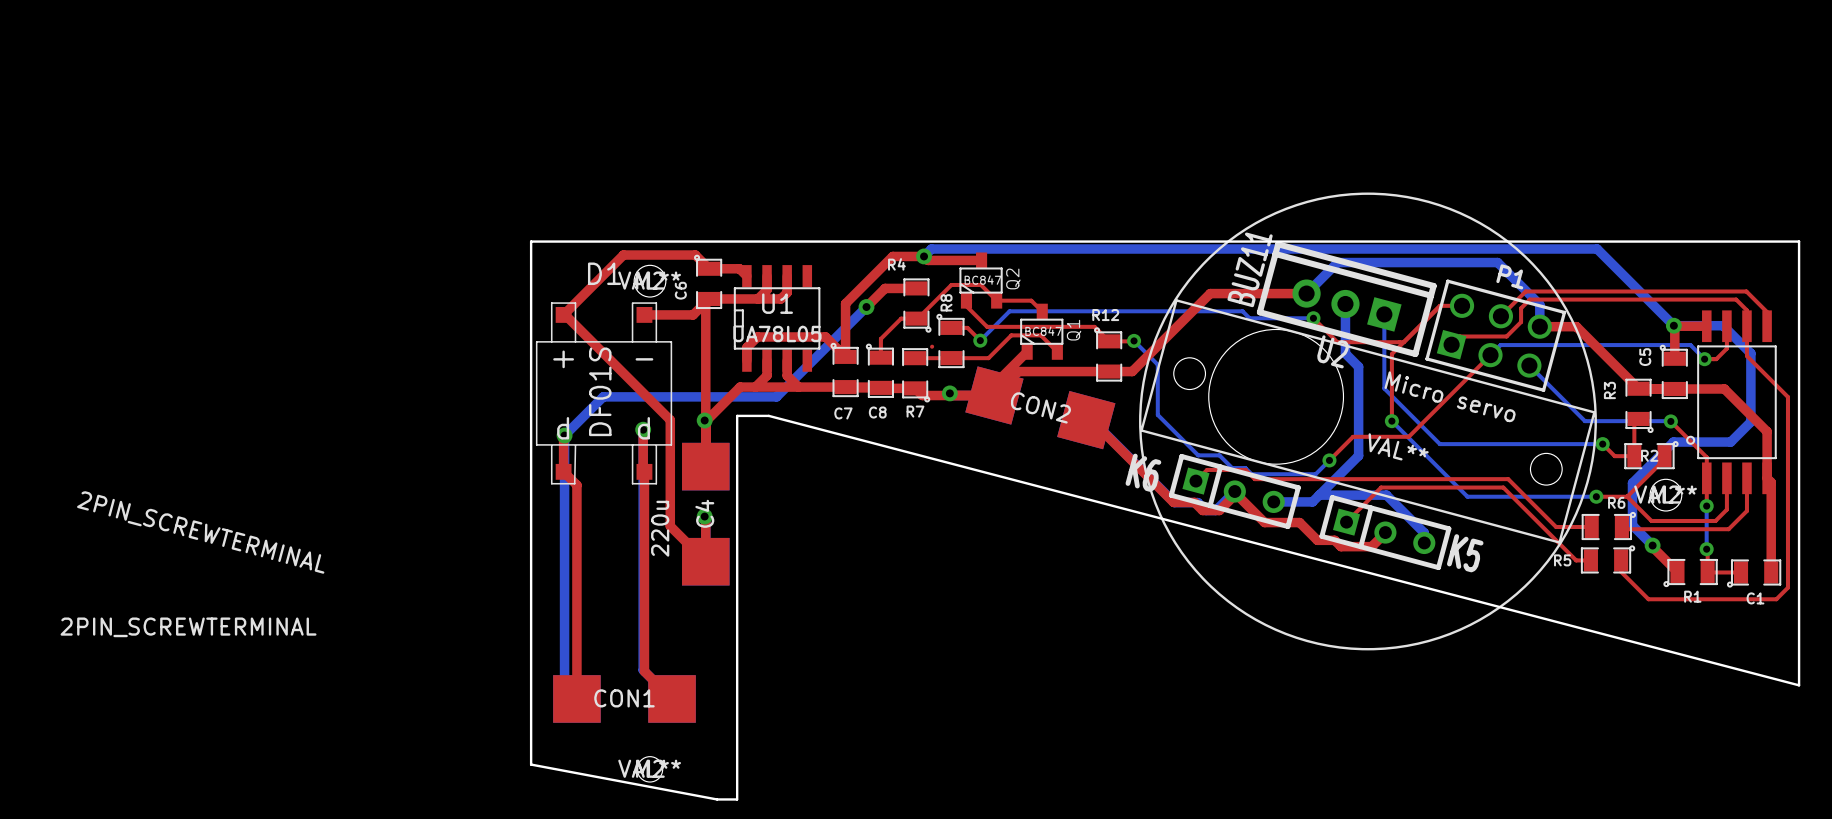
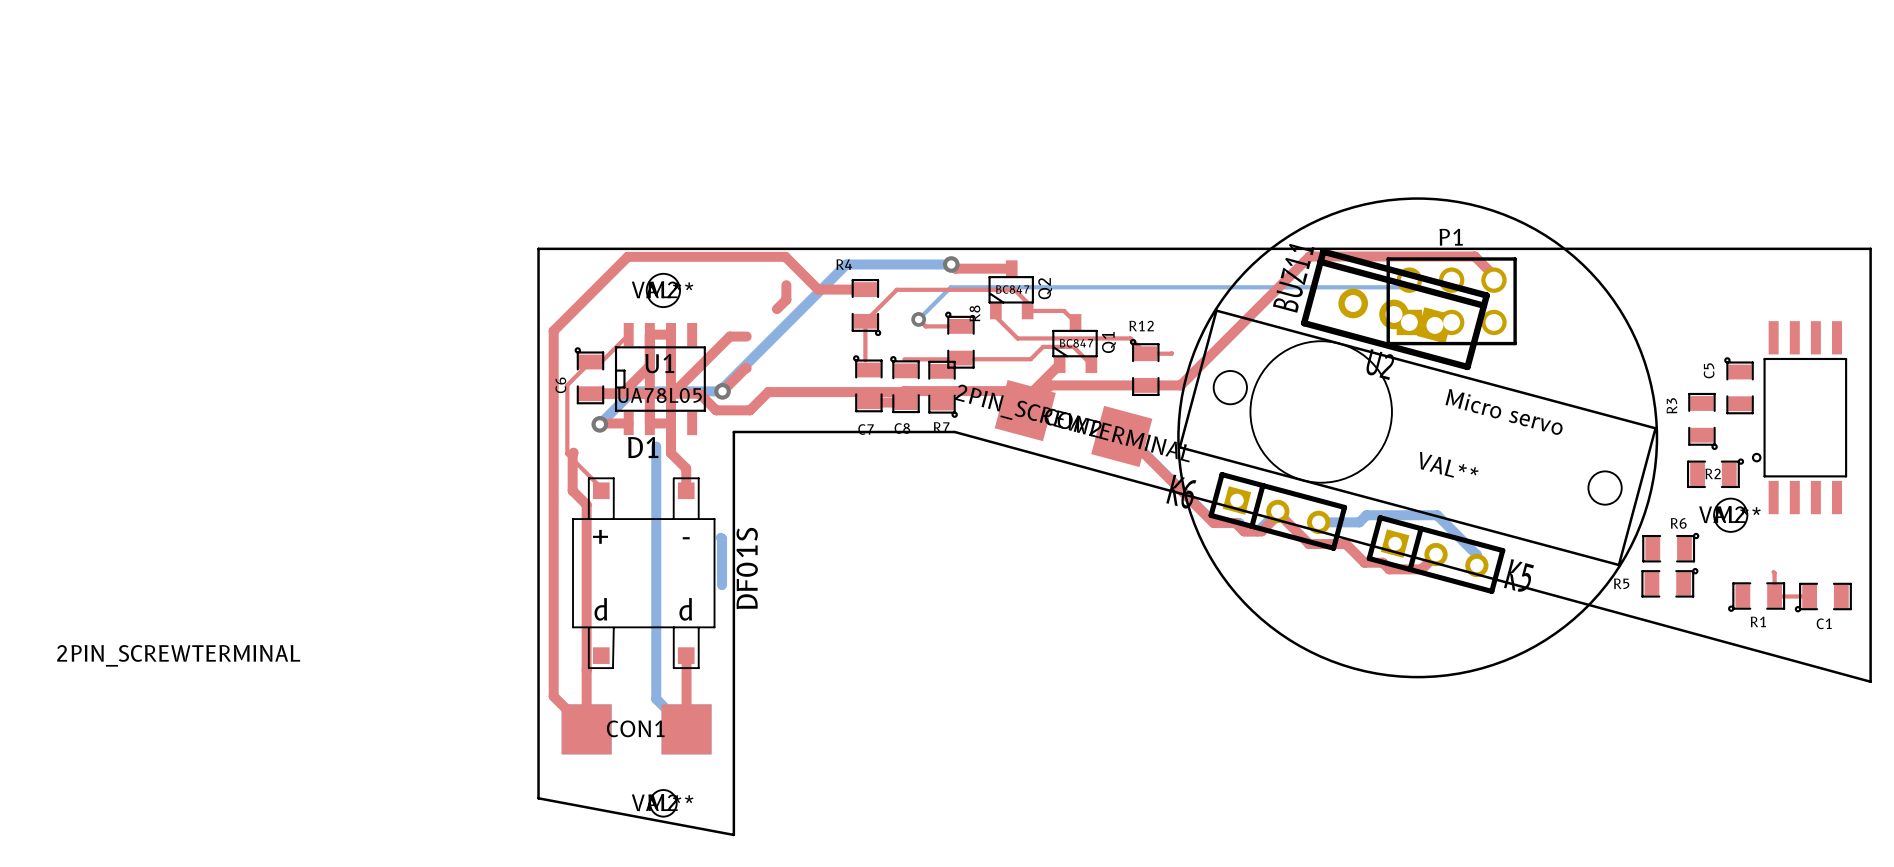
top track: (924, 256) (892, 256) (845, 303) (845, 356) (825, 336) (757, 336) (746, 347) (746, 360) -> none
bottom track: (924, 256) (931, 249) (1597, 249) (1673, 325) (1723, 325) (1750, 353) (1750, 421) (1730, 442) (1673, 442) (1632, 483) (1632, 525) (1652, 545) -> (951, 264) (846, 264) (722, 388) (722, 391) (632, 391) (599, 424)
bottom track: none -> (1409, 280) (1402, 287) (950, 287) (918, 319)
top track: (746, 276) (739, 268) (709, 268) (695, 255) (623, 255) (563, 314) (670, 420) (670, 526) (705, 561) (704, 516) -> none
top track: (787, 276) (787, 292) (780, 298) (709, 298) (693, 314) (644, 314) -> none
top track: none -> (865, 289) (818, 289) (785, 256) (627, 256) (553, 330) (553, 696) (586, 729)
C6 position: (708, 281) -> (589, 375)
top track: (916, 288) (885, 288) (866, 307) -> none
top track: (1306, 293) (1210, 293) (1132, 371) -> (1493, 280) (1493, 275) (1474, 256) (1309, 256) (1180, 385) (1170, 385)
bottom track: (1306, 293) (1337, 262) (1497, 262) (1539, 304) (1539, 326) -> none
top track: (996, 300) (980, 284) (951, 284) (917, 318) (901, 318) (880, 338) (880, 357) -> (1027, 310) (1027, 302) (1014, 289) (896, 289) (865, 321) (865, 360)
top track: (705, 302) (705, 466) -> none
bottom track: (1345, 304) (1345, 353) (1358, 366) (1358, 455) (1319, 495) -> none
R4 position: (917, 305) -> (866, 307)
top track: (1462, 305) (1440, 305) (1391, 354) (1391, 421) -> none
bottom track: (866, 307) (776, 396) (603, 396) (564, 435) (564, 686) (576, 698) -> none
via: (866, 307) -> none
top track: none -> (918, 319) (925, 326) (960, 326)
bottom track: (1384, 314) (1384, 388) (1439, 444) (1602, 444) -> none
top track: (1500, 316) (1525, 291) (1746, 291) (1767, 312) (1767, 326) -> none
U1 position: (777, 318) -> (660, 379)
top track: (1313, 318) (1337, 342) (1403, 342) -> none
bottom track: (1313, 318) (1249, 318) (1242, 311) (1009, 311) (980, 340) -> none
via: (1313, 318) -> none
top track: none -> (628, 334) (601, 362) (590, 362) (567, 385) (567, 453) (601, 487) (601, 490)
top track: none -> (746, 336) (729, 336) (672, 393)
top track: (1673, 325) (1674, 358) -> none
via: (1673, 325) -> none
top track: (1539, 326) (1576, 326) (1638, 388) (1724, 388) (1767, 431) (1767, 478) (1771, 482) (1771, 572) -> none
top track: (1674, 326) (1706, 326) -> none
top track: (1726, 326) (1726, 348) (1716, 359) (1704, 359) -> none
top track: (951, 327) (967, 327) (980, 340) -> none
top track: (1040, 335) (1011, 335) (988, 358) (915, 358) -> (1074, 347) (1043, 346) (1030, 359) (959, 359)
P1 rotation: 0° (1495, 335) -> 15° counterclockwise (1451, 301)
P1 position: (1495, 335) -> (1451, 301)
R8 position: (950, 340) -> (959, 340)
via position: (980, 340) -> (918, 319)
bottom track: (1134, 340) (1157, 364) (1157, 414) (1198, 455) (1219, 455) (1232, 468) (1245, 468) (1251, 474) (1315, 474) (1329, 460) -> none
via: (1134, 340) -> none
top track: (1451, 344) (1459, 336) (1506, 336) (1521, 322) (1521, 308) (1529, 299) (1736, 299) (1746, 310) (1746, 356) (1787, 397) (1787, 587) (1776, 599) (1648, 599) (1621, 571) (1621, 560) -> none
top track: none -> (904, 359) (959, 359)
top track: none -> (649, 365) (622, 393)
top track: none -> (746, 368) (722, 391)
top track: (1490, 355) (1408, 436) (1353, 436) (1329, 460) -> none
bottom track: (1490, 355) (1500, 345) (1690, 345) (1704, 359) -> none
via: (1704, 359) -> none
top track: (767, 360) (767, 375) (755, 387) -> none
top track: (787, 360) (787, 375) (798, 387) -> none
bottom track: (1529, 365) (1584, 421) (1670, 421) -> none
CON2 footprint: [965, 366, 1116, 450] -> [994, 379, 1153, 468]
via: none -> (722, 391)
D1 value position: DF01S (600, 391) -> DF01S (747, 568)
D1 position: (604, 393) -> (643, 573)
via: (949, 393) -> none
top track: (994, 395) (922, 395) (915, 388) (880, 387) (740, 387) (705, 421) -> (1025, 410) (1005, 391) (768, 392) (750, 410) (716, 410) (699, 393) (590, 393)
top track: none -> (628, 423) (599, 424)
top track: none -> (670, 423) (649, 423) (649, 334) (670, 334) (670, 453) (686, 468) (686, 490)
via: none -> (599, 424)
board edge: (737, 415) (737, 799) -> (754, 432) (733, 432) (733, 834)
board edge: (768, 415) (1799, 685) (1799, 653) -> (788, 432) (954, 432) (1870, 681)
top track: (1638, 418) (1634, 423) (1634, 456) (1614, 456) (1602, 444) -> none
via: (704, 420) -> none
bottom track: (1391, 421) (1467, 496) (1596, 496) -> none
via: (1391, 421) -> none
top track: (1670, 421) (1706, 457) (1706, 505) -> none
via: (1670, 421) -> none
top track: (643, 429) (644, 671) (672, 698) -> (686, 655) (686, 729)
via: (643, 429) -> none
via: (564, 435) -> none
via: (1602, 444) -> none
top track: (1664, 456) (1664, 459) (1627, 496) (1596, 496) -> none
via: (1329, 460) -> none
top track: (1726, 478) (1726, 509) (1715, 520) (1651, 520) (1628, 496) -> none
top track: (1746, 478) (1746, 510) (1728, 529) (1624, 529) (1621, 527) -> none
top track: (1195, 481) (1207, 469) (1245, 469) (1254, 479) (1508, 479) (1556, 527) (1591, 527) -> none
via: (1596, 496) -> none
bottom track: (1706, 506) (1706, 549) -> none
via: (1706, 506) -> none
C4: 220u (705, 514) -> none
via: (704, 516) -> none
top track: (1346, 522) (1381, 487) (1503, 487) (1576, 560) (1590, 560) -> none
CON2 value position: 2PIN_SCREWTERMINAL (200, 532) -> 2PIN_SCREWTERMINAL (1072, 423)
top track: (1652, 545) (1677, 572) -> none
via: (1652, 545) -> none
via: (1706, 549) -> none
board edge: (717, 799) (737, 799) -> none

